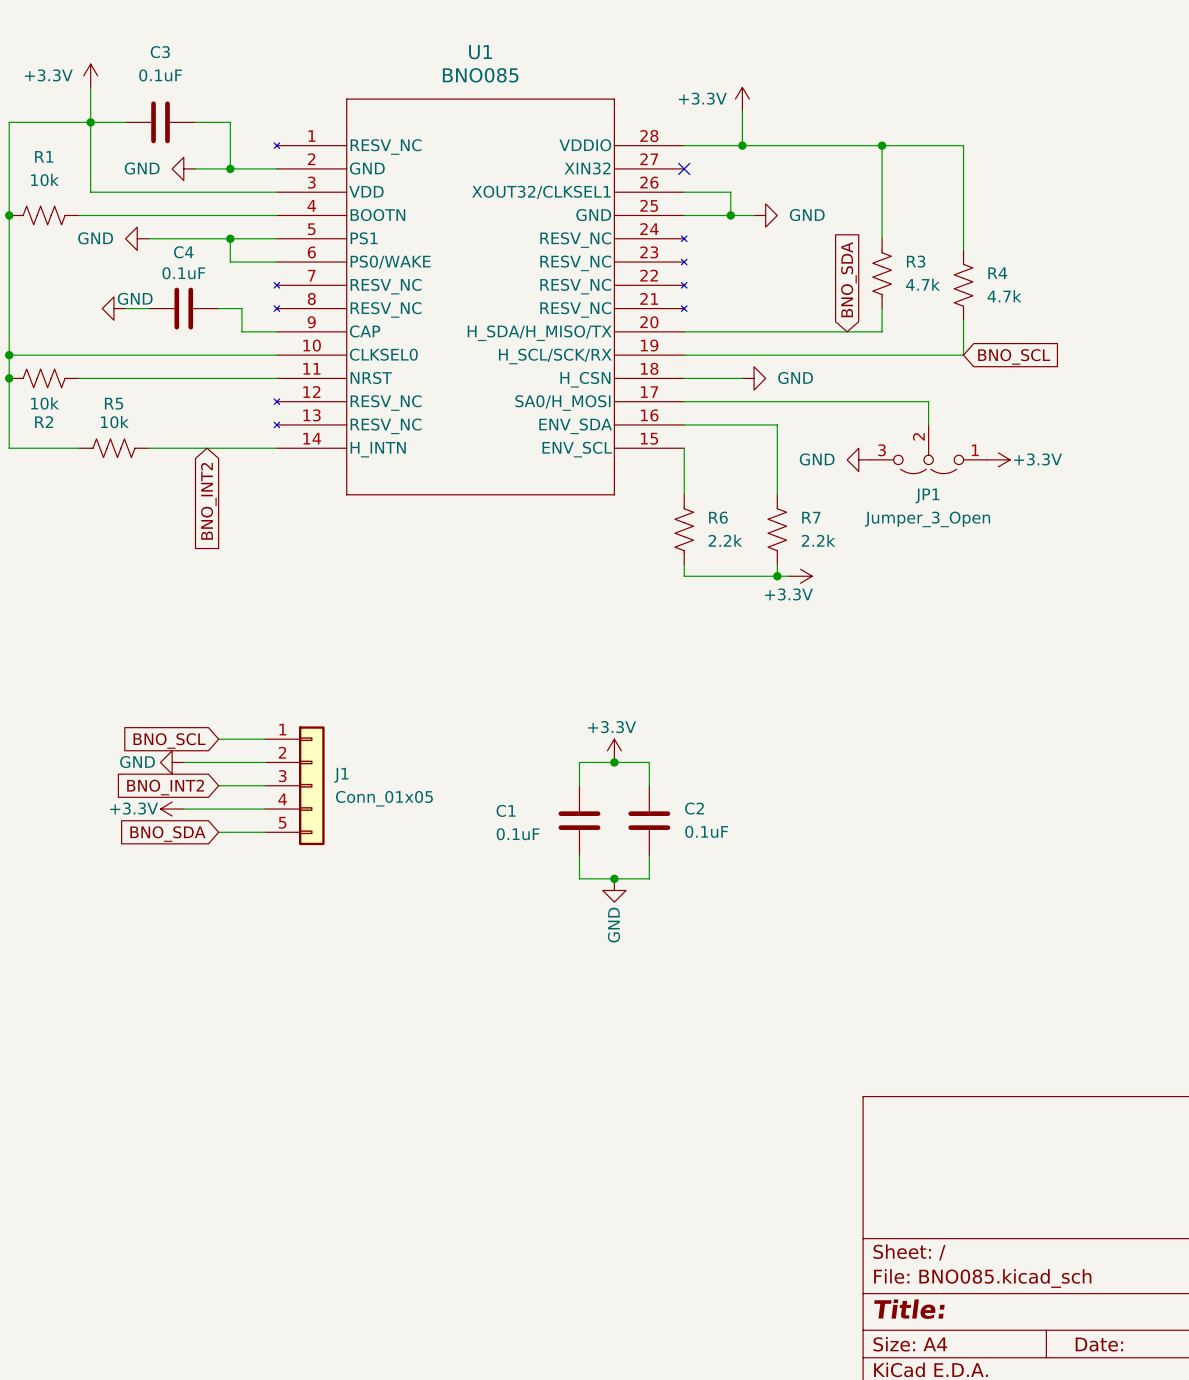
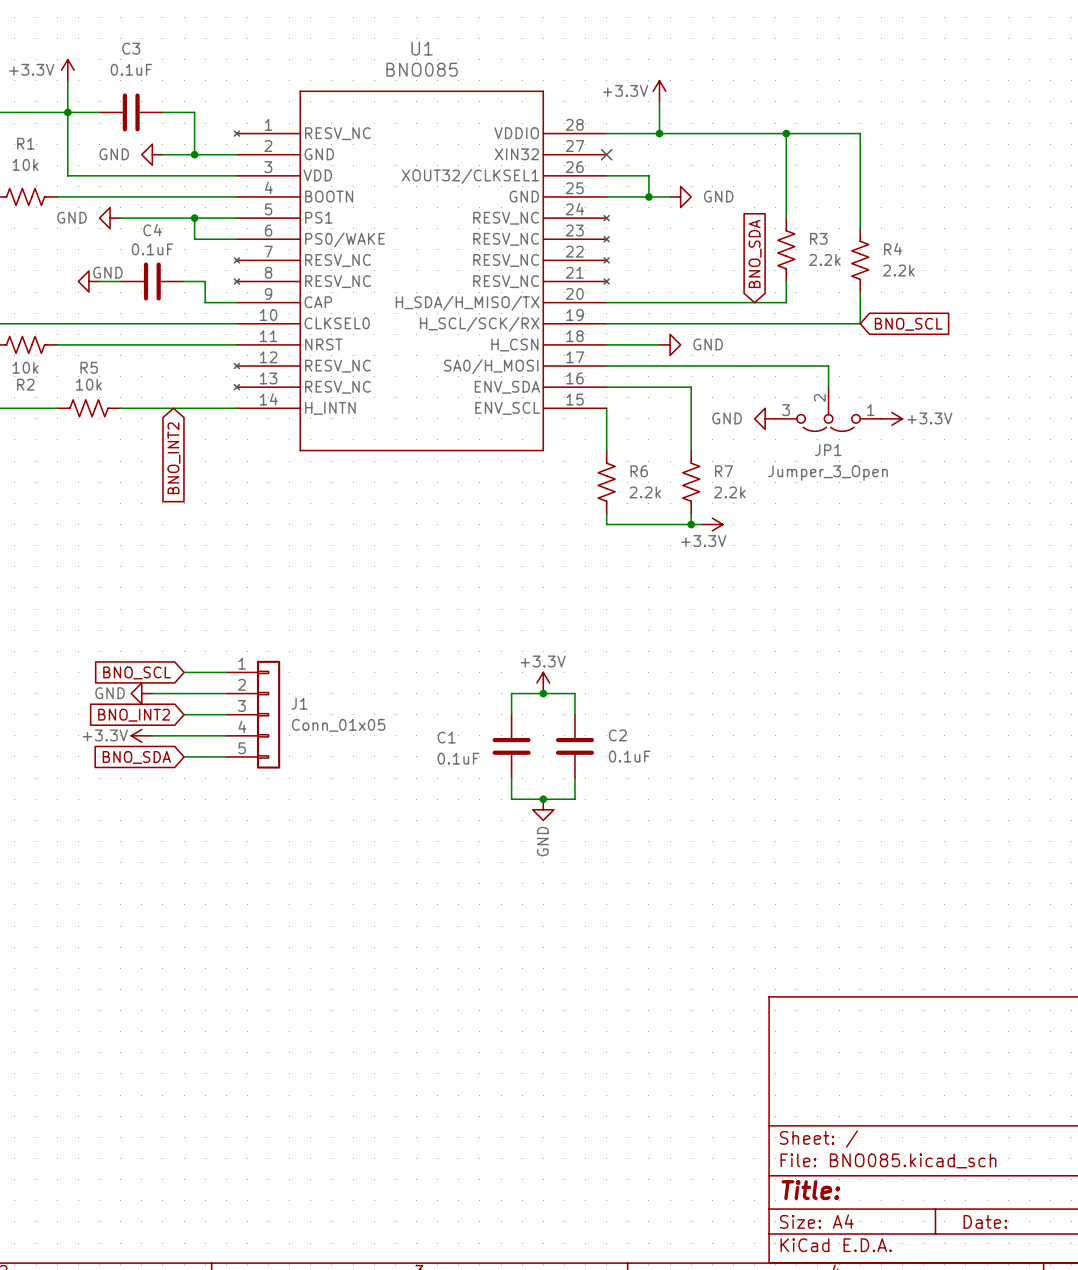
R3 value: 4.7k (923, 284) -> 2.2k (824, 259)
R4 value: 4.7k (1004, 296) -> 2.2k (898, 270)

